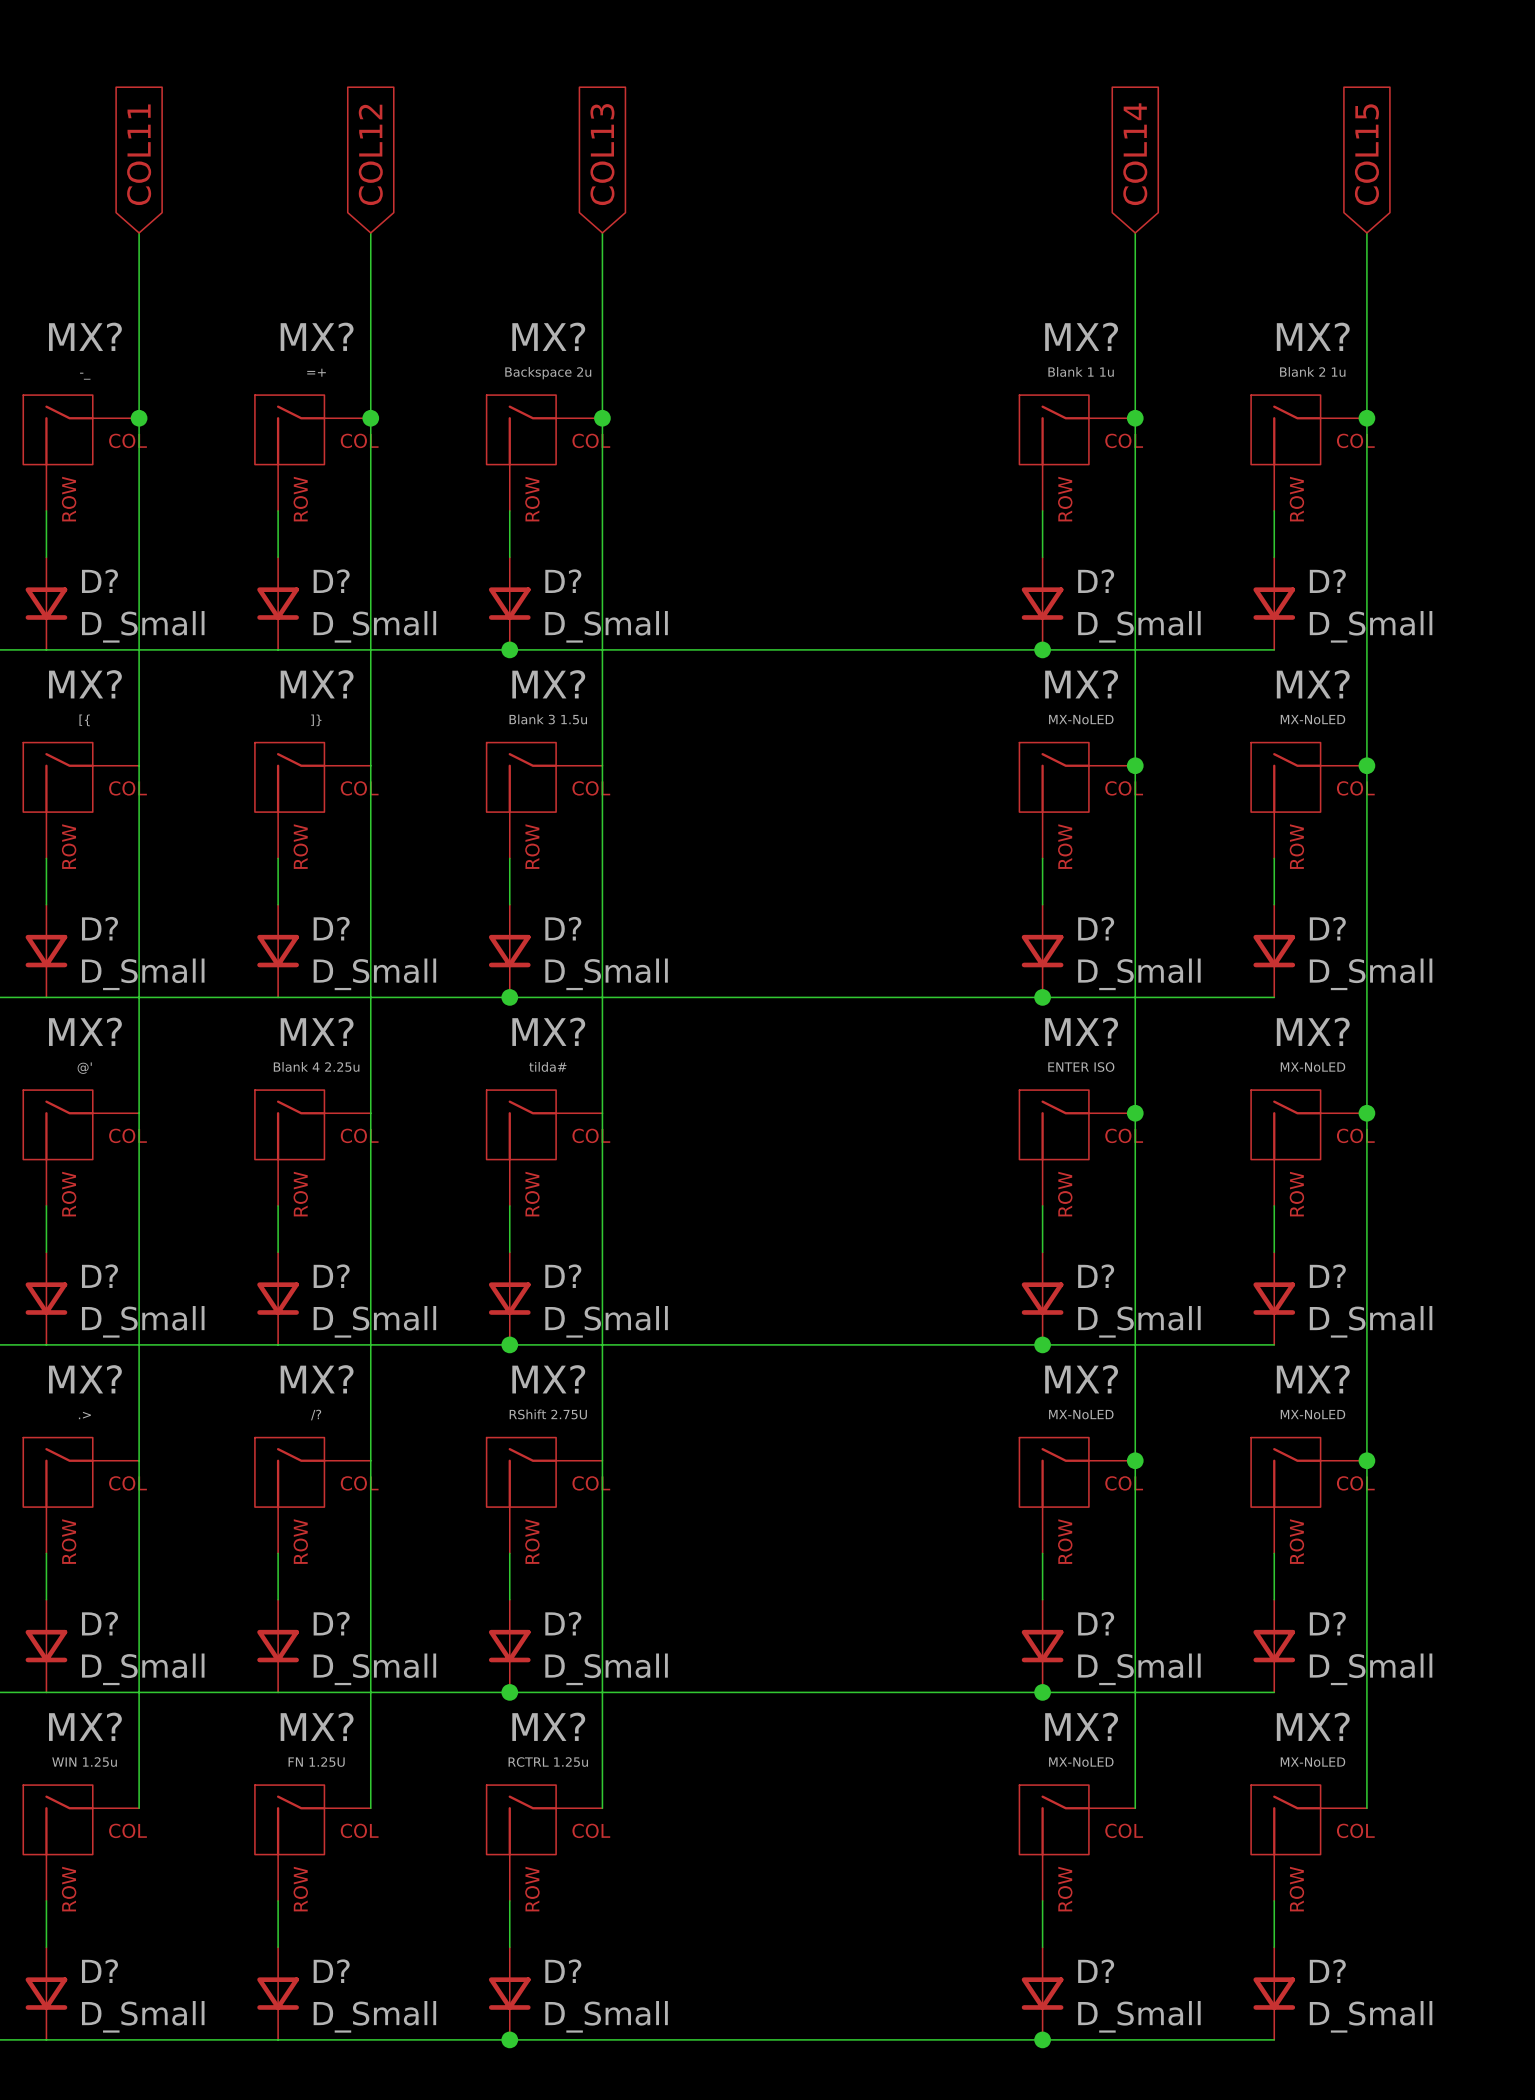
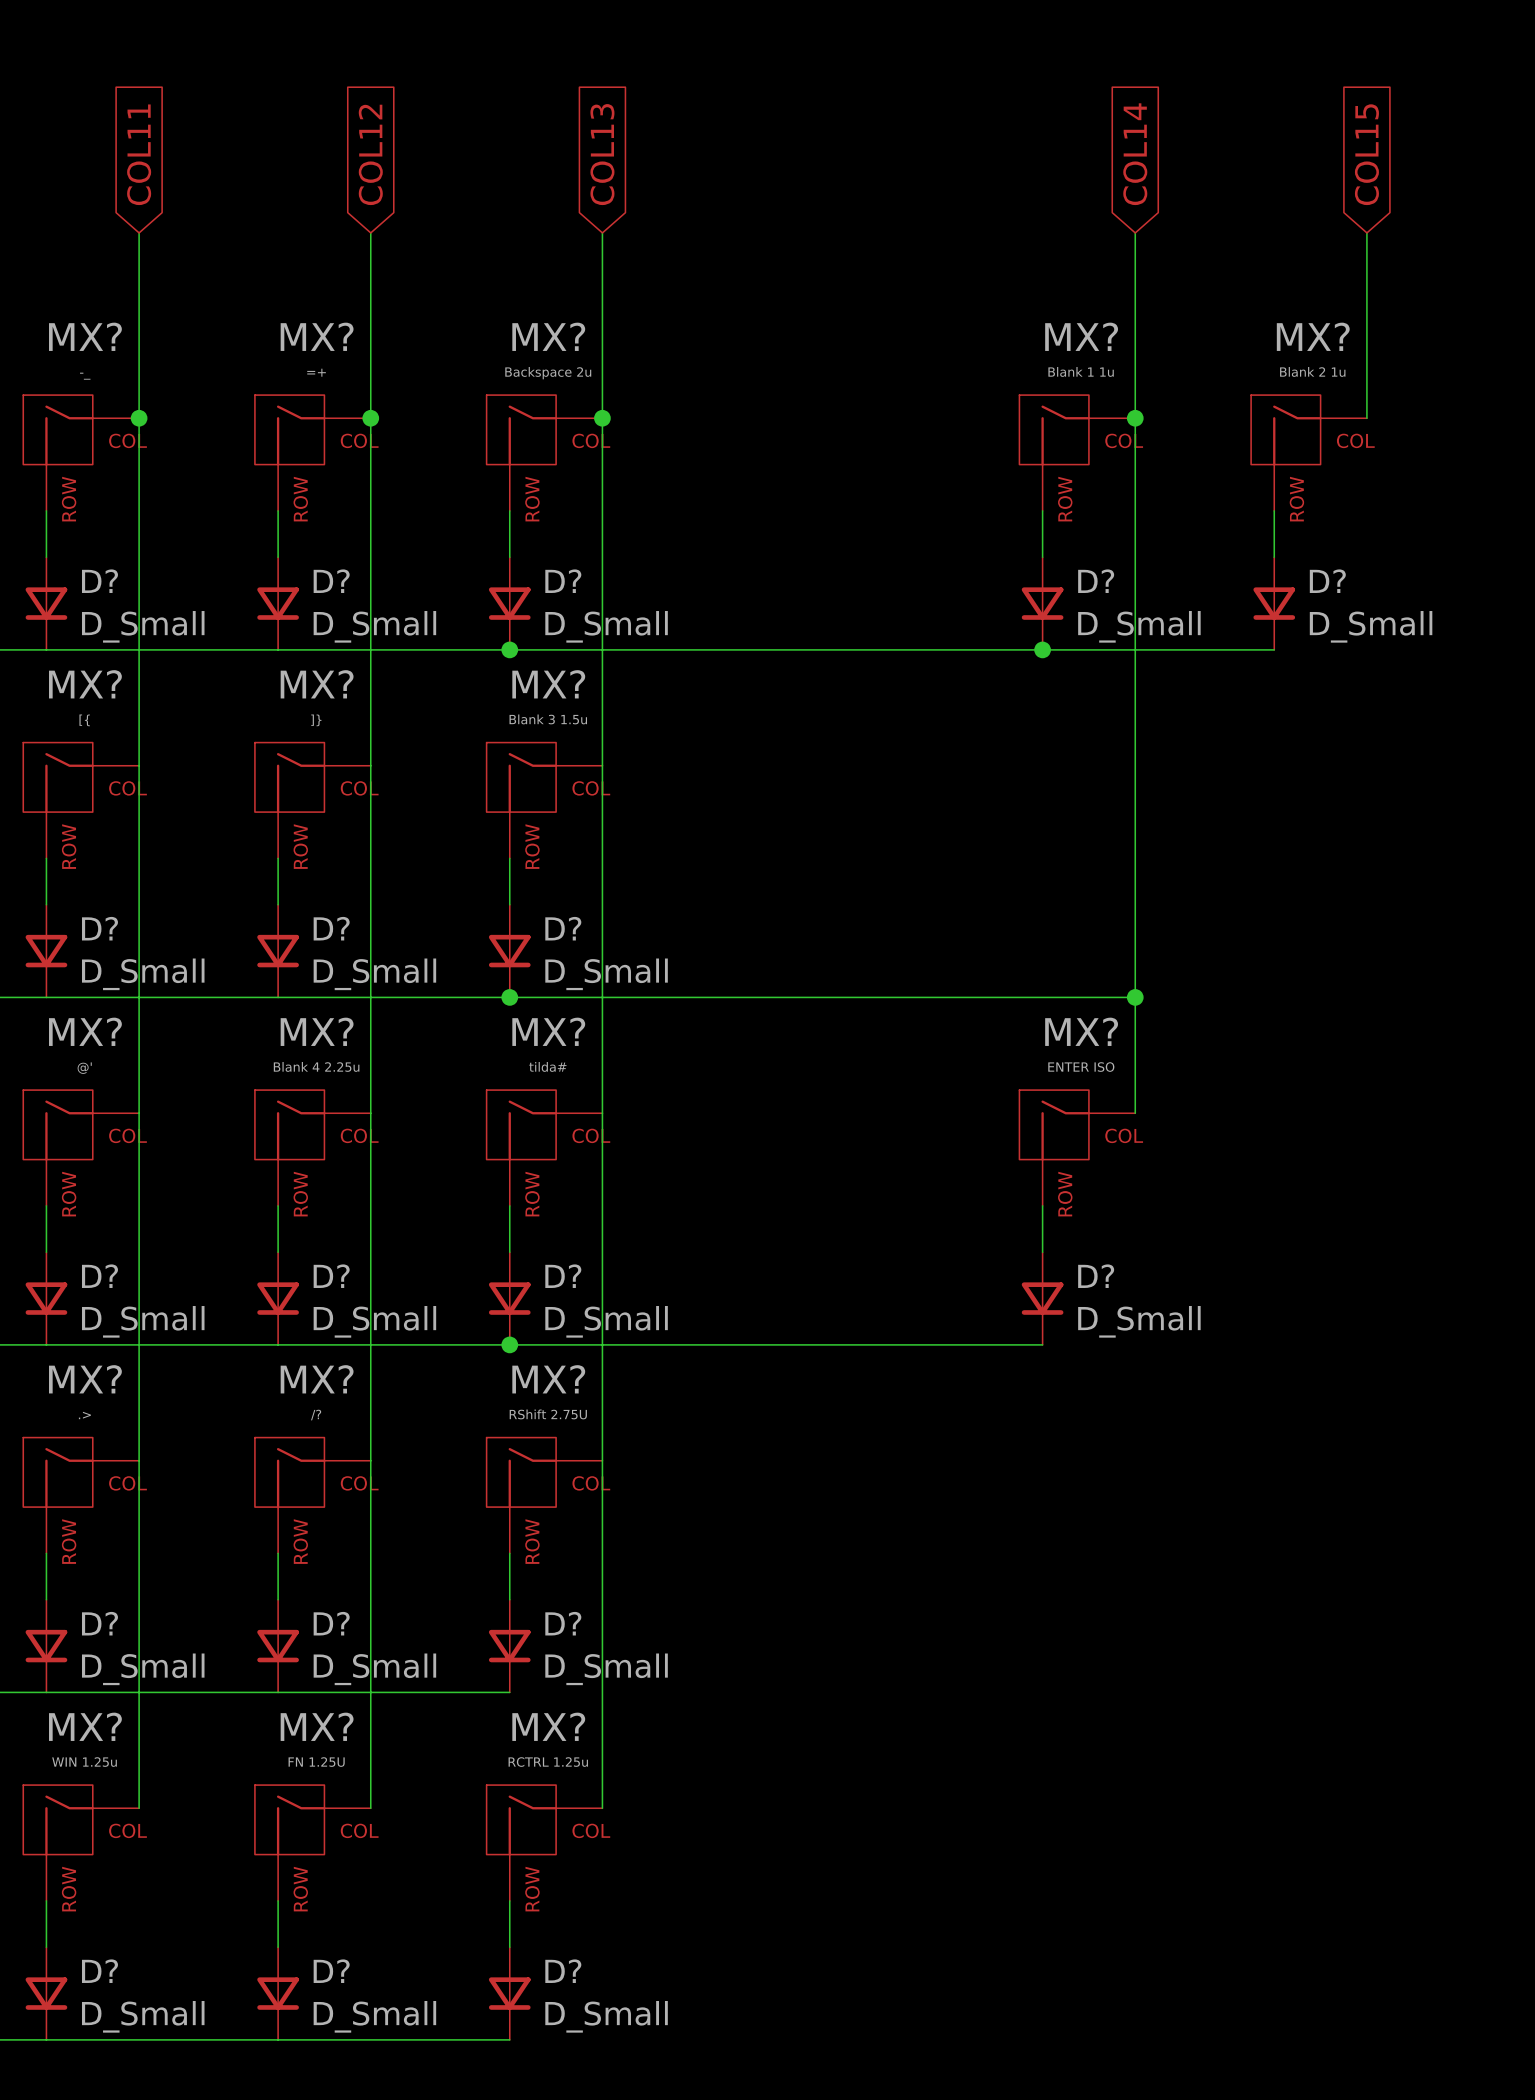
wire: (1366, 418) (1366, 1808) -> none
junction: (1366, 418) -> none
junction: (1135, 765) -> none
junction: (1366, 765) -> none
MX?: MX-NoLED (1077, 800) -> none
MX?: MX-NoLED (1309, 800) -> none
wire: (1042, 858) (1042, 904) -> none
wire: (1274, 858) (1274, 904) -> none
D?: D_Small (1042, 951) -> none
D?: D_Small (1274, 951) -> none
junction: (1042, 997) -> none
wire: (1135, 997) (1274, 997) -> none
junction: none -> (1135, 997)
wire: (1135, 1113) (1135, 1808) -> none
junction: (1135, 1113) -> none
junction: (1366, 1113) -> none
MX?: MX-NoLED (1309, 1148) -> none
wire: (1274, 1205) (1274, 1252) -> none
D?: D_Small (1274, 1298) -> none
wire: (1042, 1344) (1274, 1344) -> none
junction: (1042, 1344) -> none
junction: (1135, 1460) -> none
junction: (1366, 1460) -> none
MX?: MX-NoLED (1077, 1495) -> none
MX?: MX-NoLED (1309, 1495) -> none
wire: (1042, 1553) (1042, 1599) -> none
wire: (1274, 1553) (1274, 1599) -> none
D?: D_Small (1042, 1646) -> none
D?: D_Small (1274, 1646) -> none
wire: (509, 1692) (1274, 1692) -> none
junction: (509, 1692) -> none
junction: (1042, 1692) -> none
MX?: MX-NoLED (1077, 1842) -> none
MX?: MX-NoLED (1309, 1842) -> none
wire: (1042, 1900) (1042, 1947) -> none
wire: (1274, 1900) (1274, 1947) -> none
D?: D_Small (1042, 1993) -> none
D?: D_Small (1274, 1993) -> none
wire: (509, 2039) (1274, 2039) -> none
junction: (509, 2039) -> none
junction: (1042, 2039) -> none

